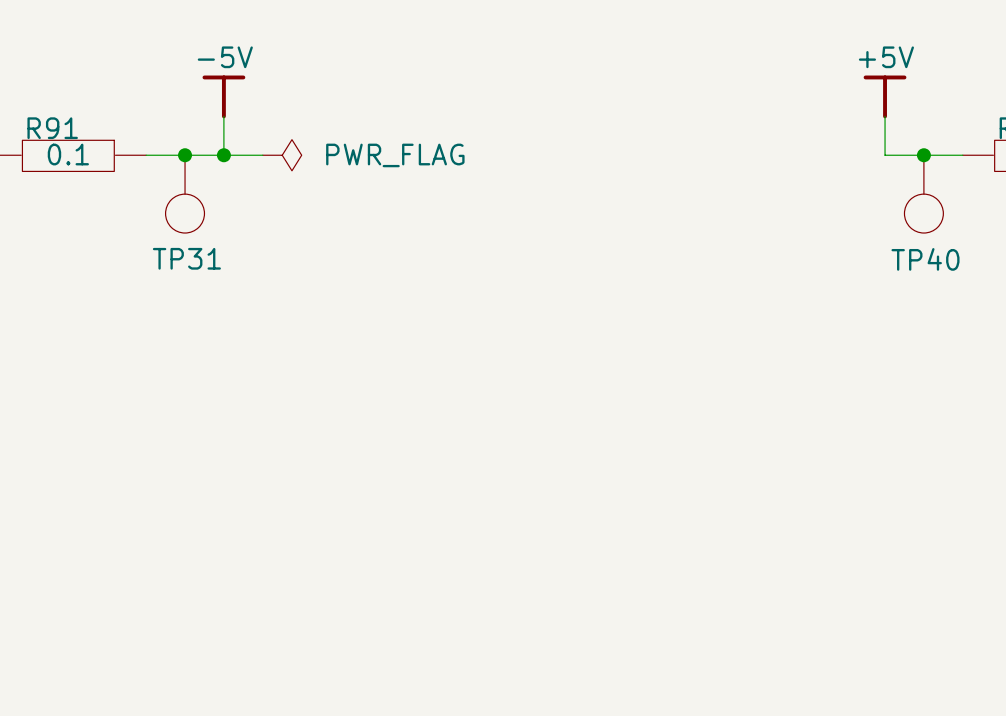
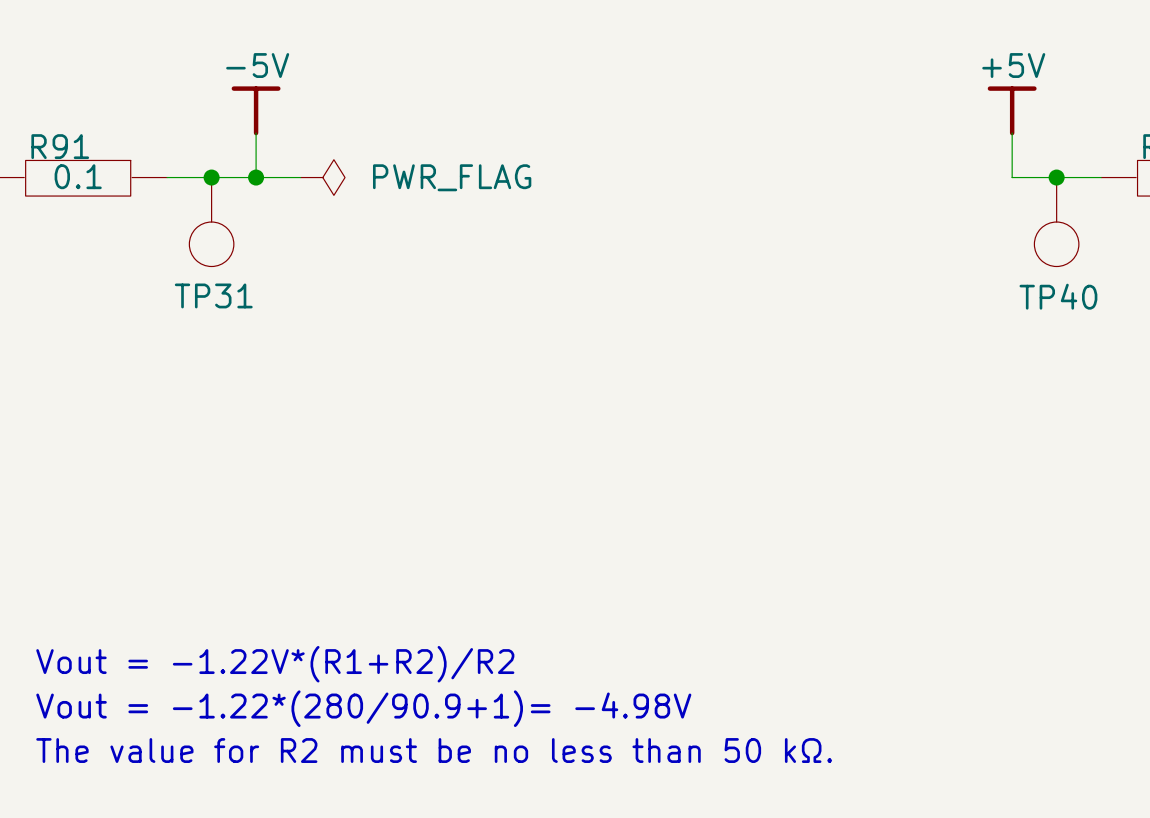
text: none -> Vout = -1.22V*(R1+R2)/R2 (275, 664)
text: none -> Vout = -1.22*(280/90.9+1)= -4.98V (363, 708)
text: none -> The value for R2 must be no less than 50 kΩ. (434, 750)

